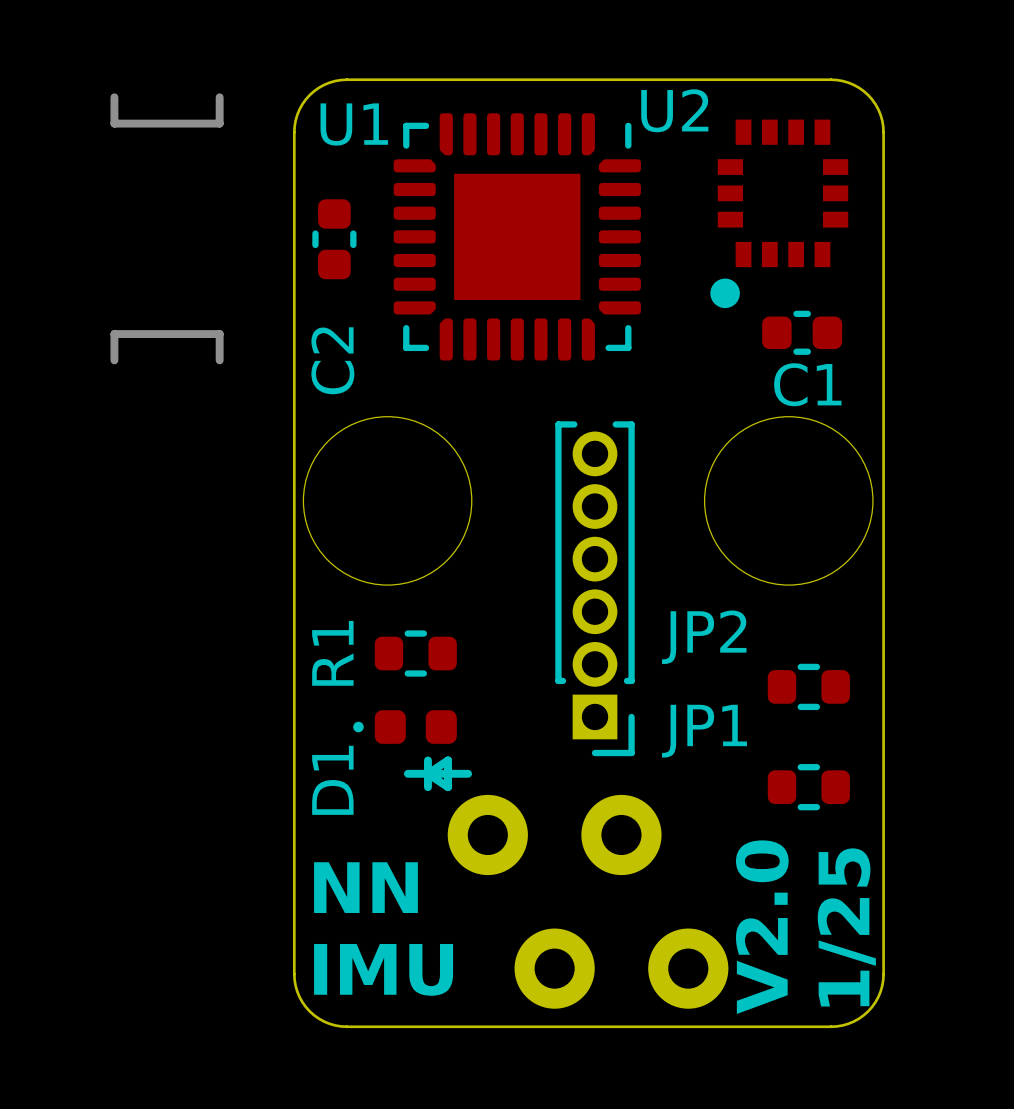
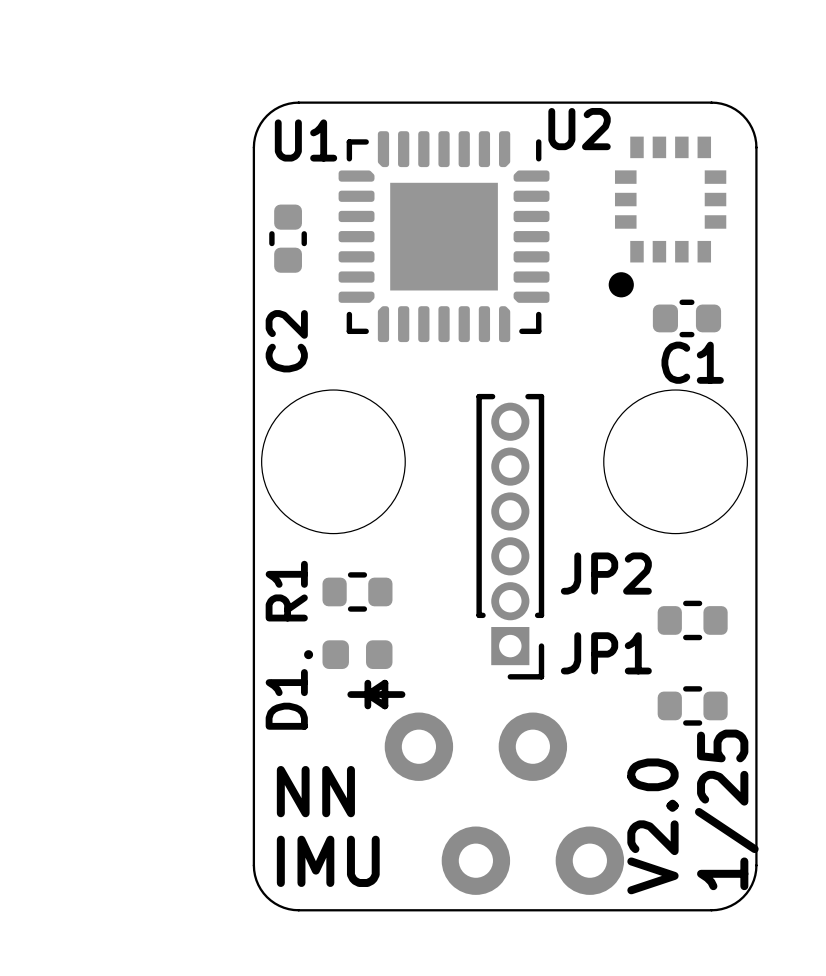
line: (114, 97) (114, 123) (219, 123) (219, 97) -> none
line: (114, 360) (114, 334) (219, 334) (219, 360) -> none

